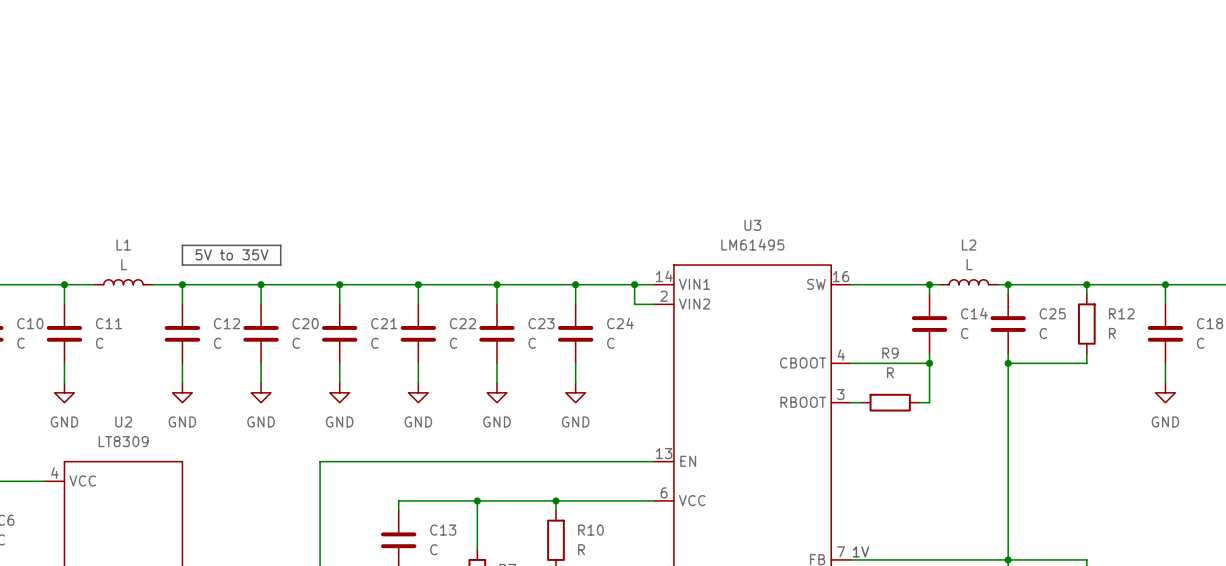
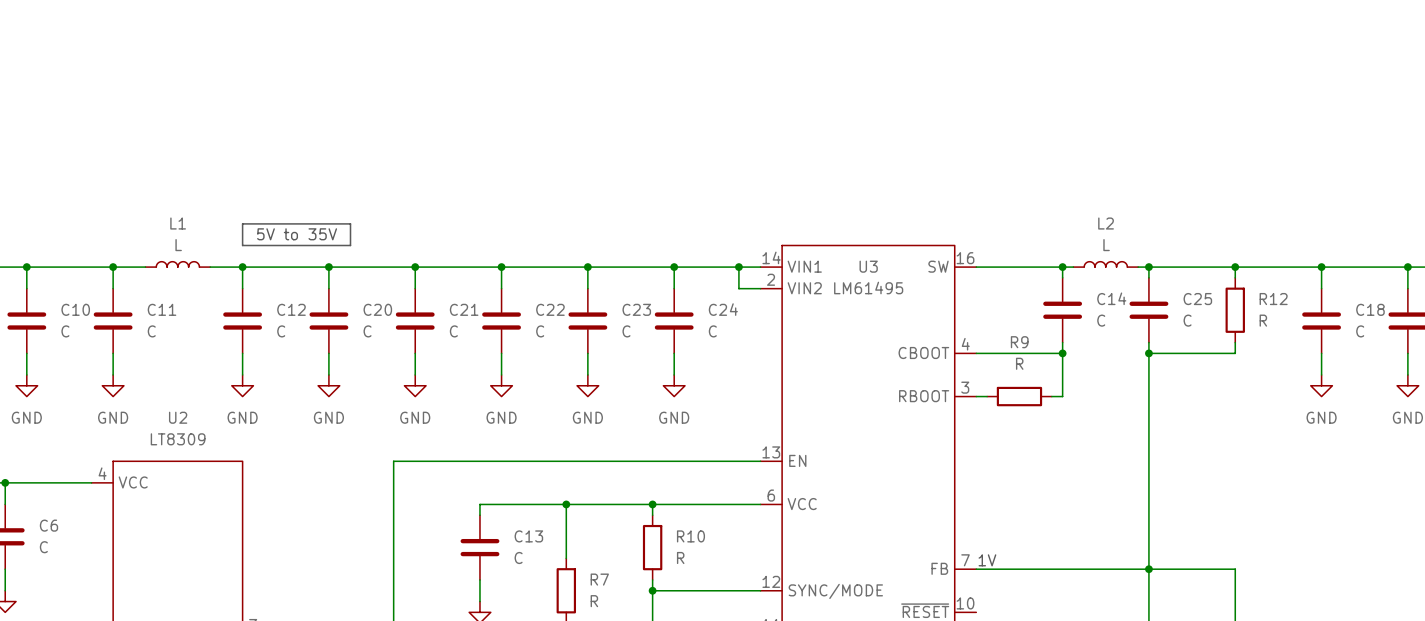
U3 name position: U3 (752, 225) -> U3 (868, 266)
U3 value position: LM61495 (752, 244) -> LM61495 (868, 288)

